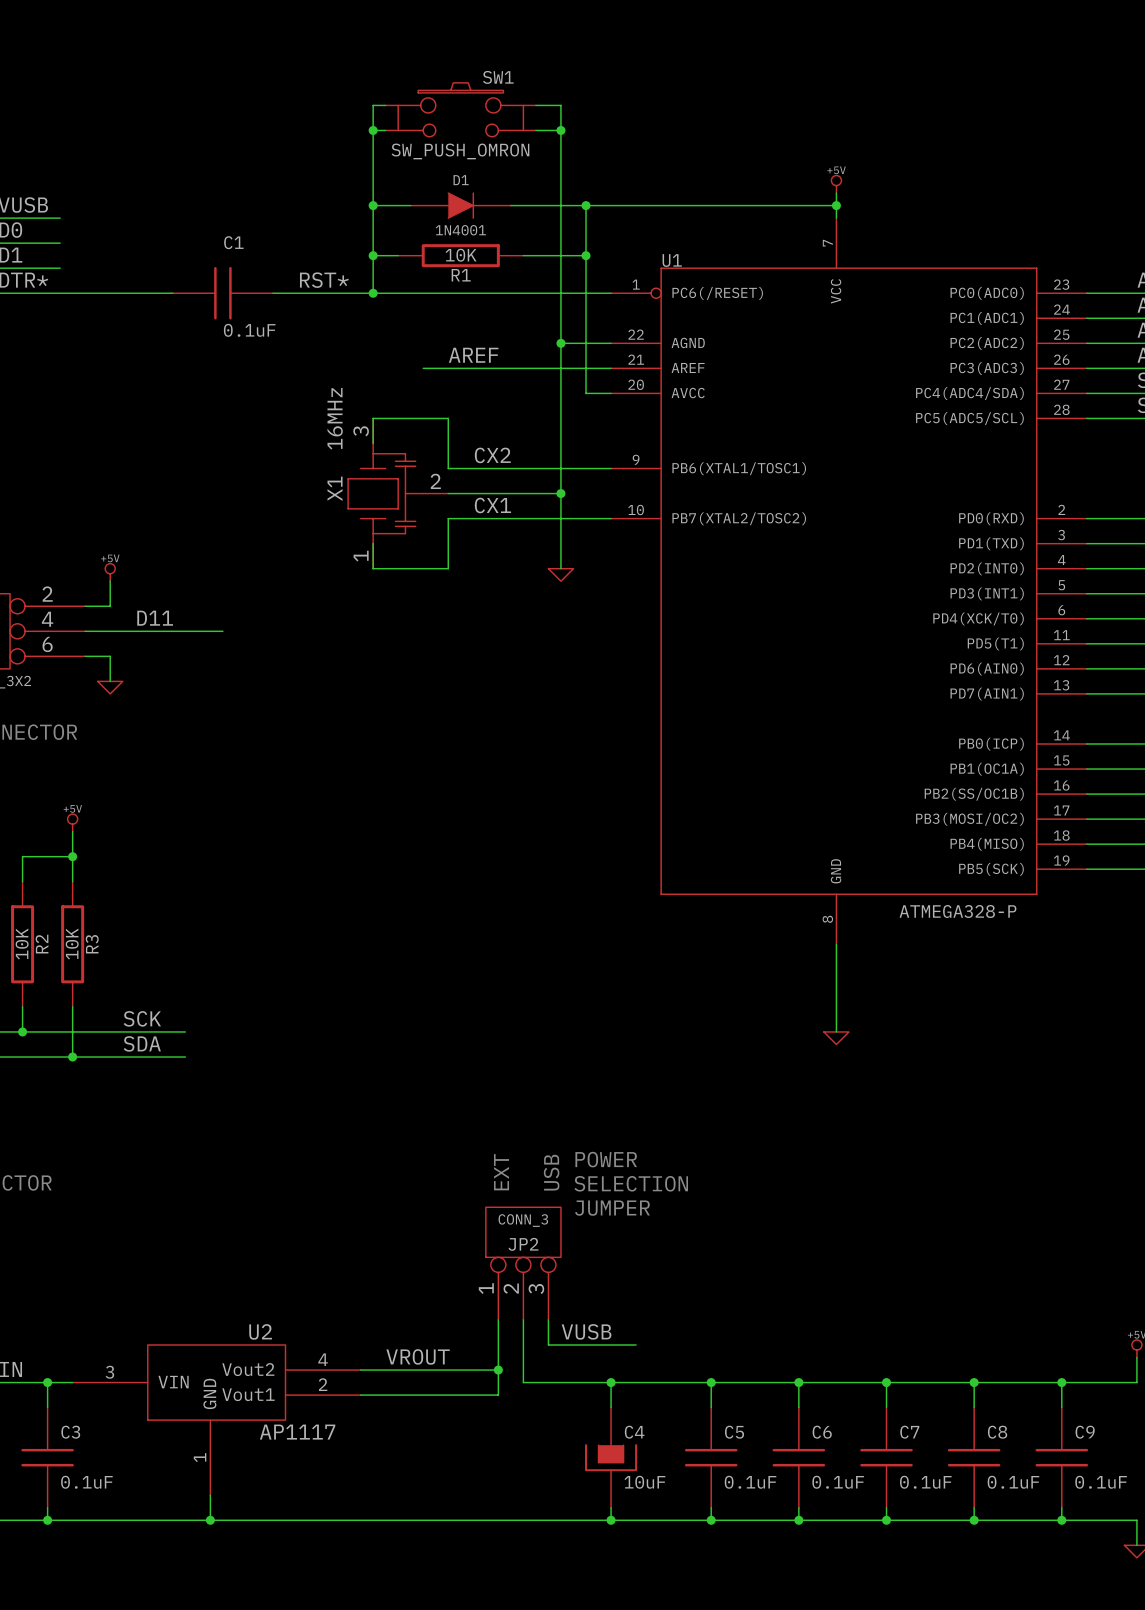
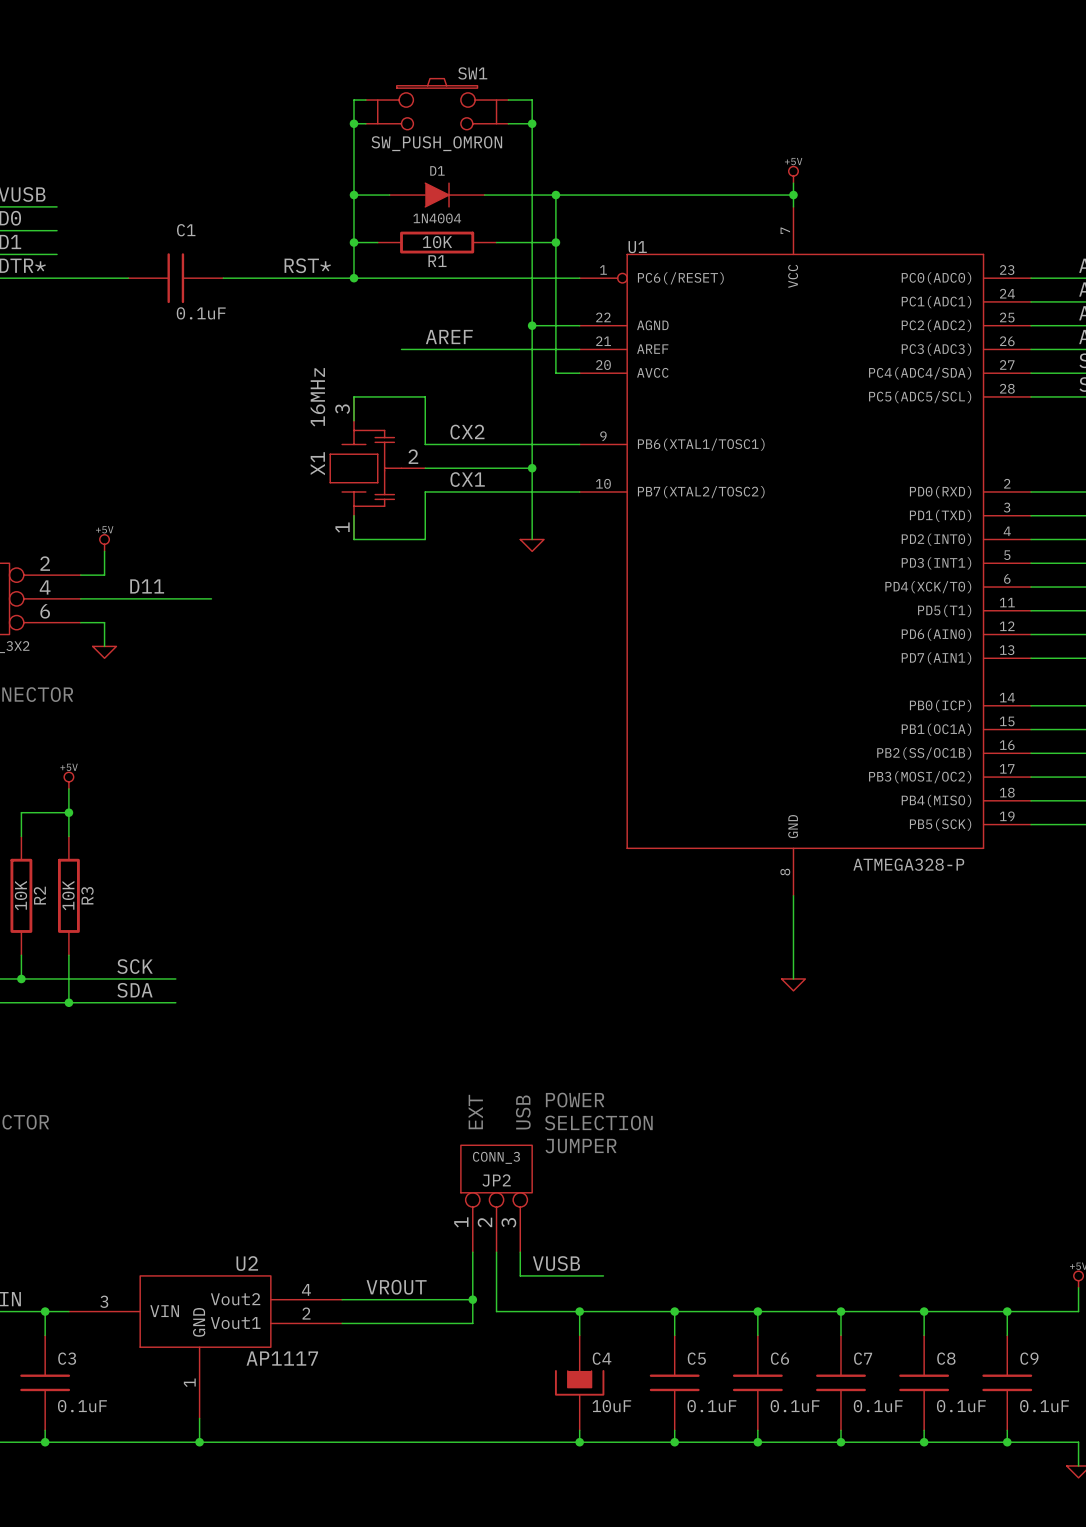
D1 value: 1N4001 (460, 230) -> 1N4004 (437, 218)
C1 position: (222, 293) -> (175, 278)

